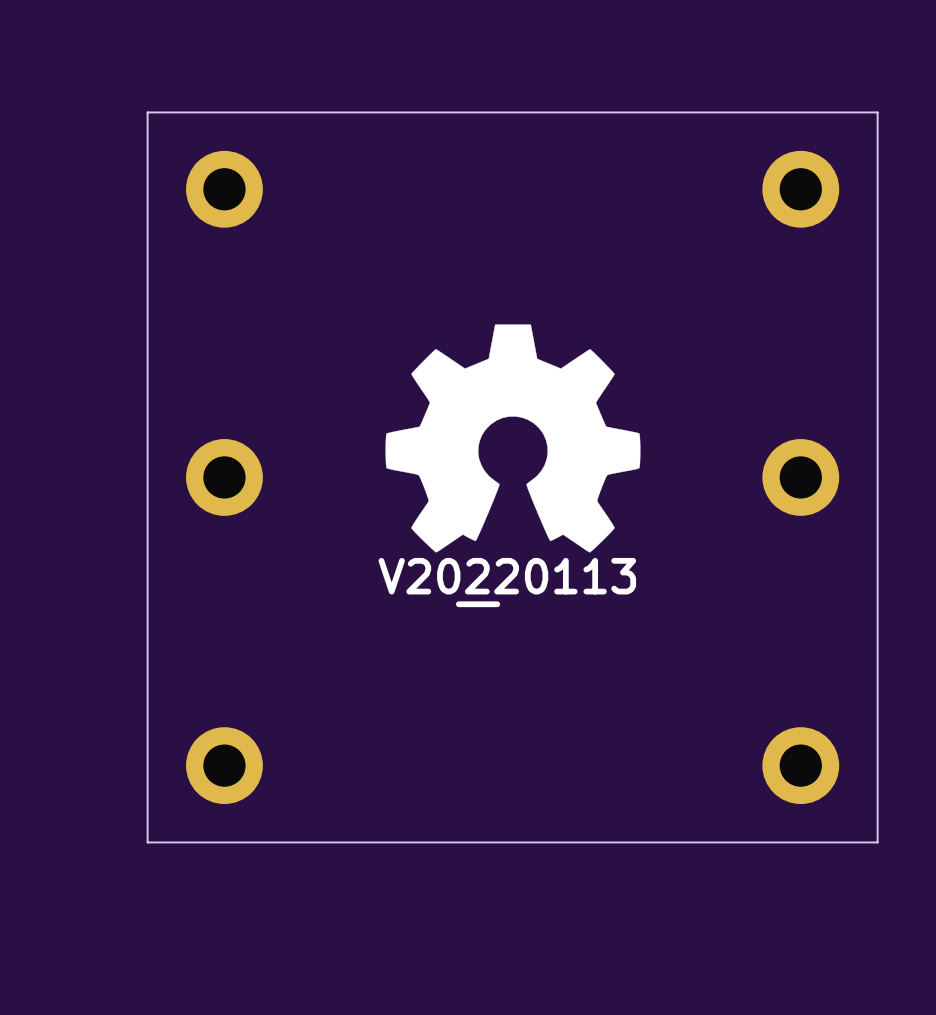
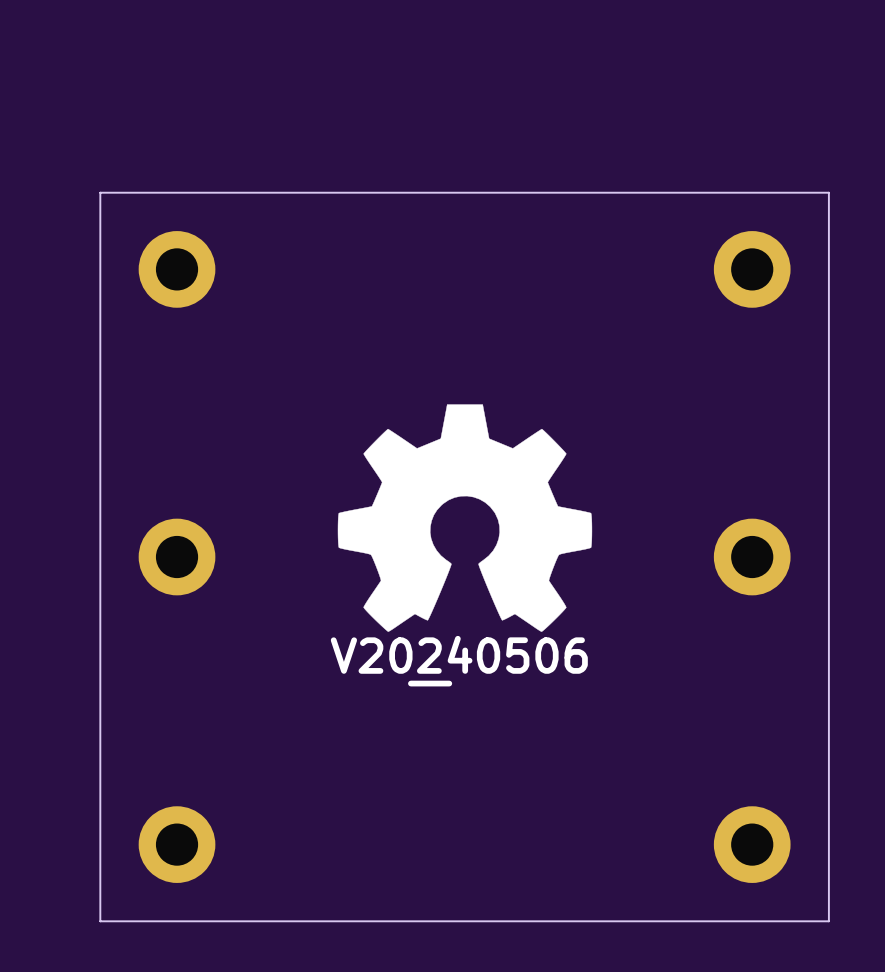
drawing shape: [378, 557, 637, 608] -> [330, 635, 588, 687]

